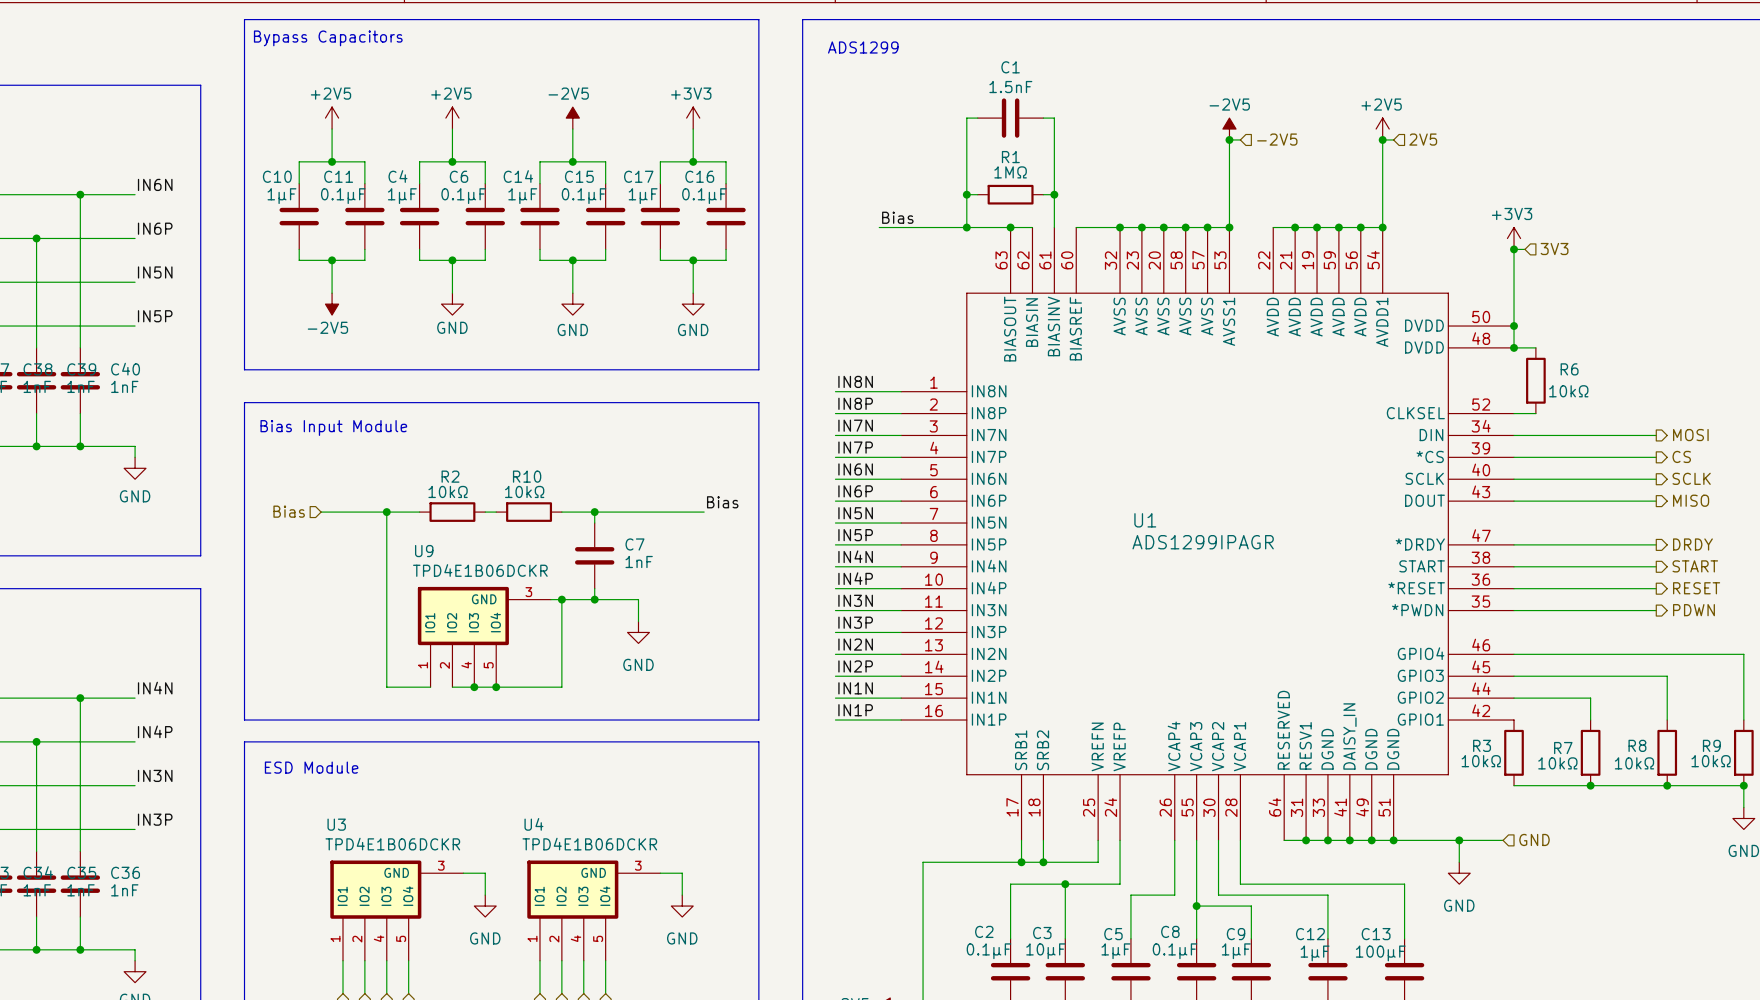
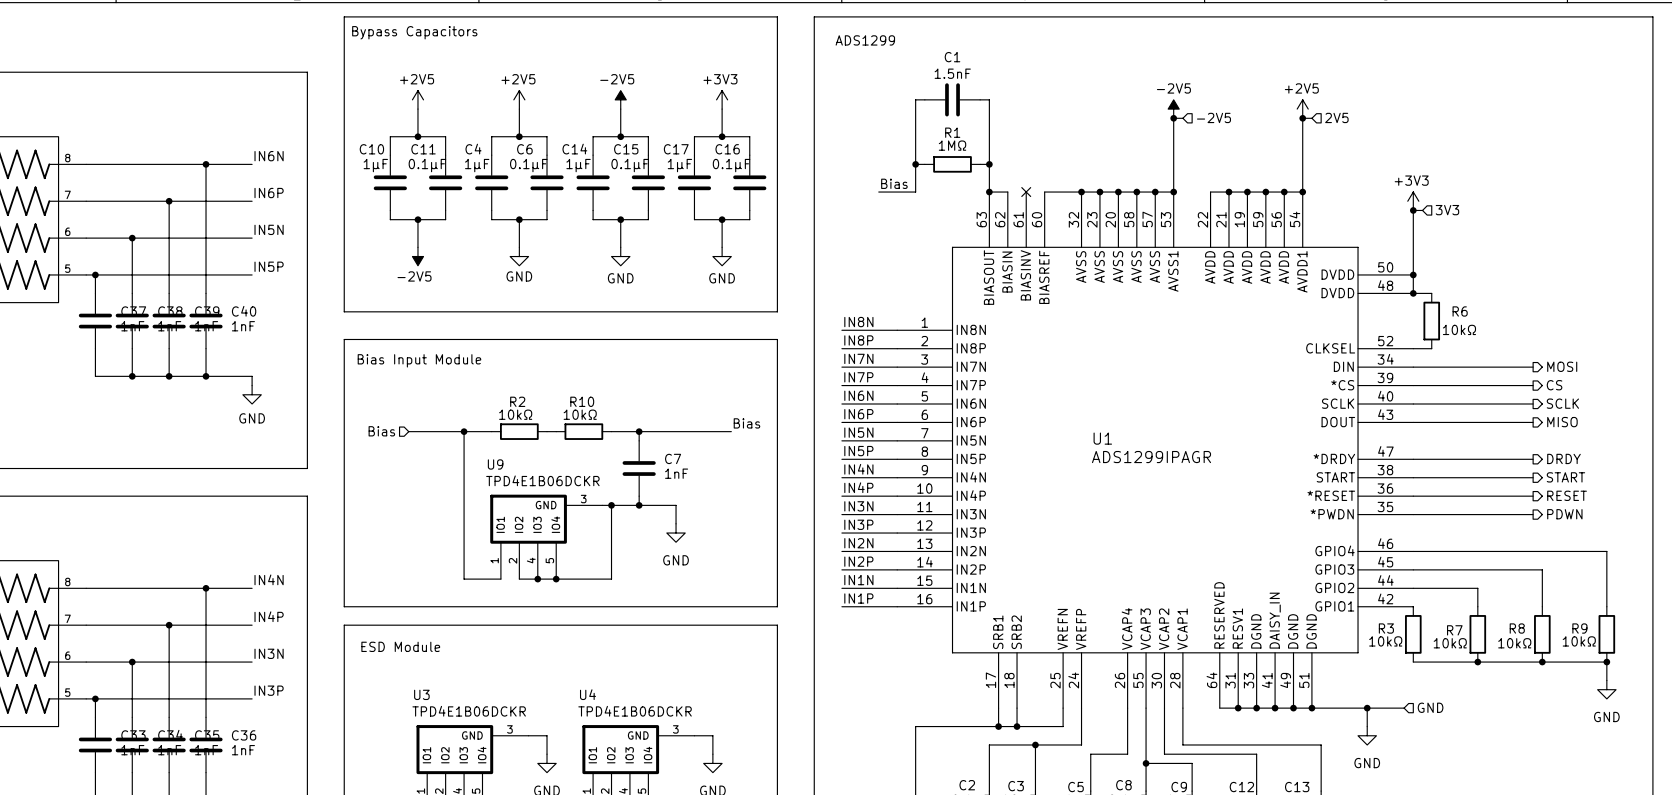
wire: (977, 118) (966, 118) (966, 227) -> (924, 99) (915, 99) (915, 192)
C1 position: (1010, 118) -> (952, 99)
wire: (1043, 118) (1054, 118) (1054, 227) -> none
junction: none -> (915, 164)
wire: (966, 194) (977, 194) -> (915, 164) (924, 164)
junction: (966, 194) -> none
junction: none -> (989, 164)
R1 position: (1010, 194) -> (952, 164)
wire: (1043, 194) (1054, 194) -> (980, 164) (989, 164)
junction: (1054, 194) -> none
wire: (923, 227) (1010, 227) -> (980, 99) (989, 99) (989, 192)
junction: (966, 227) -> none
no-connect mark: none -> (1026, 192)

